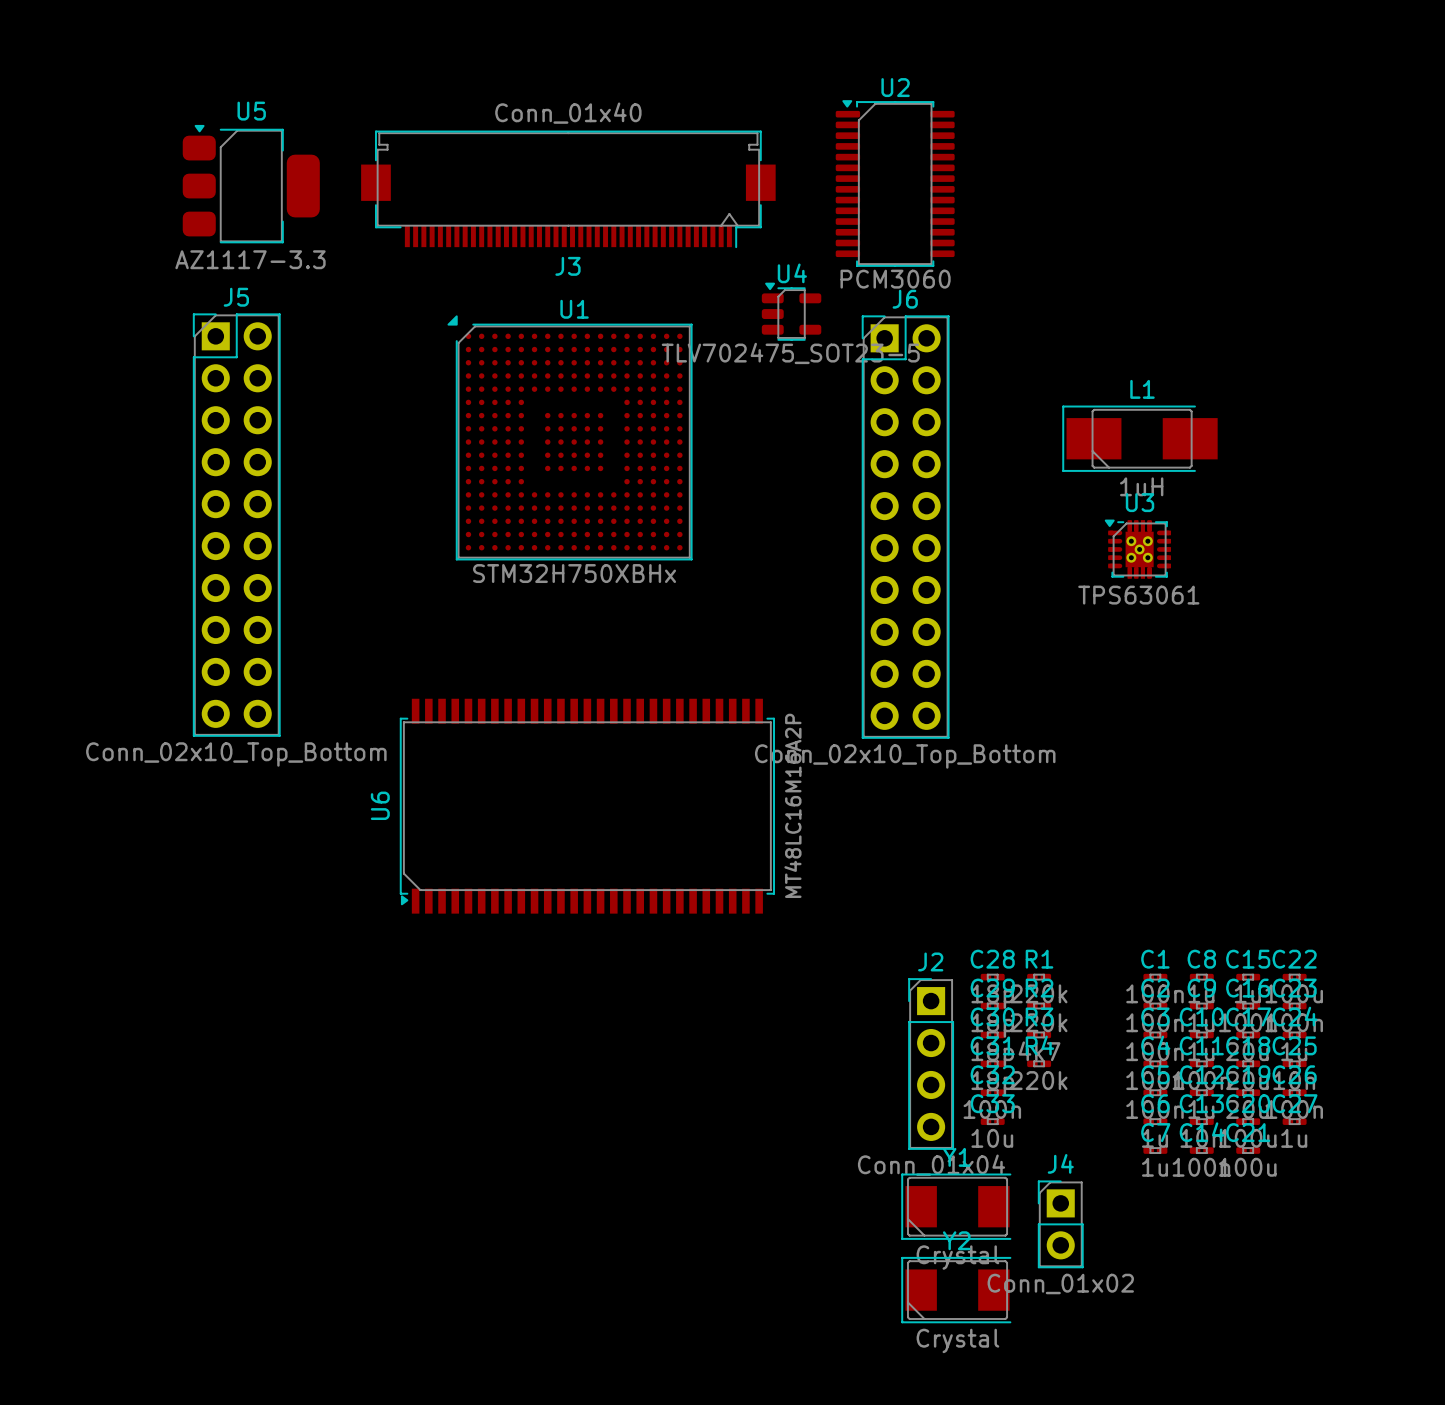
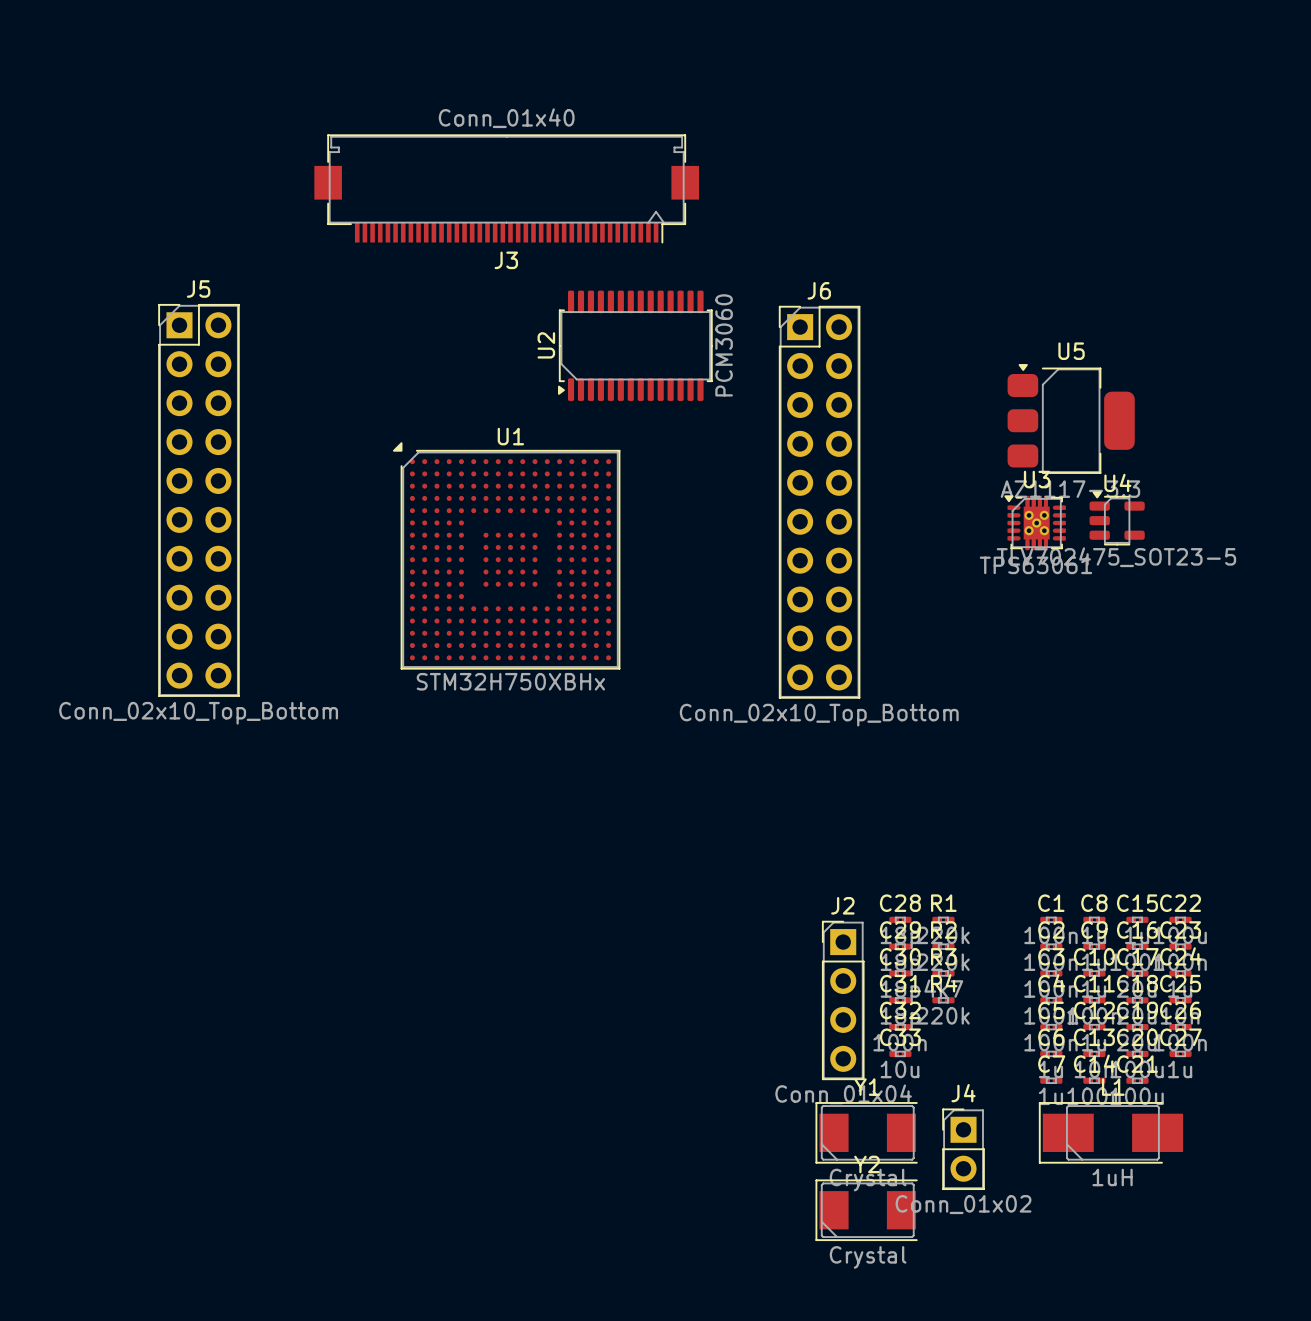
U2 rotation: 0° (895, 183) -> 90° counterclockwise (635, 345)
U2 position: (895, 183) -> (635, 345)
U5 position: (251, 184) -> (1071, 418)
U4 position: (791, 311) -> (1117, 518)
U1 position: (570, 437) -> (506, 555)
L1 position: (1139, 438) -> (1110, 1132)
U6: MT48LC16M16A2P (587, 806) -> none

